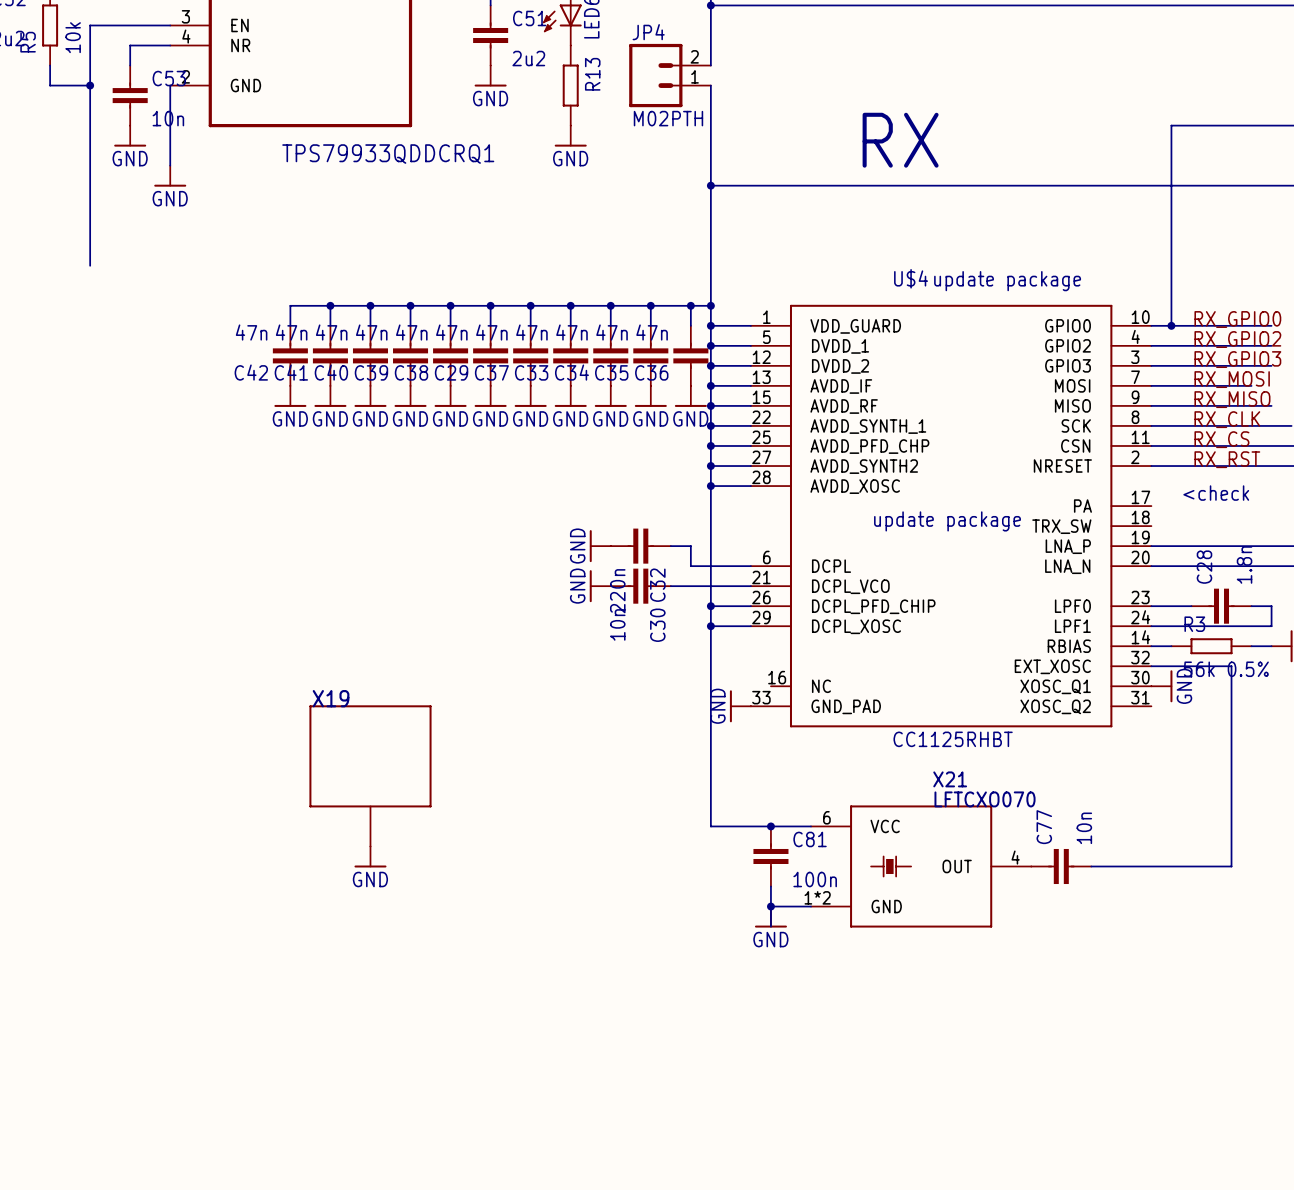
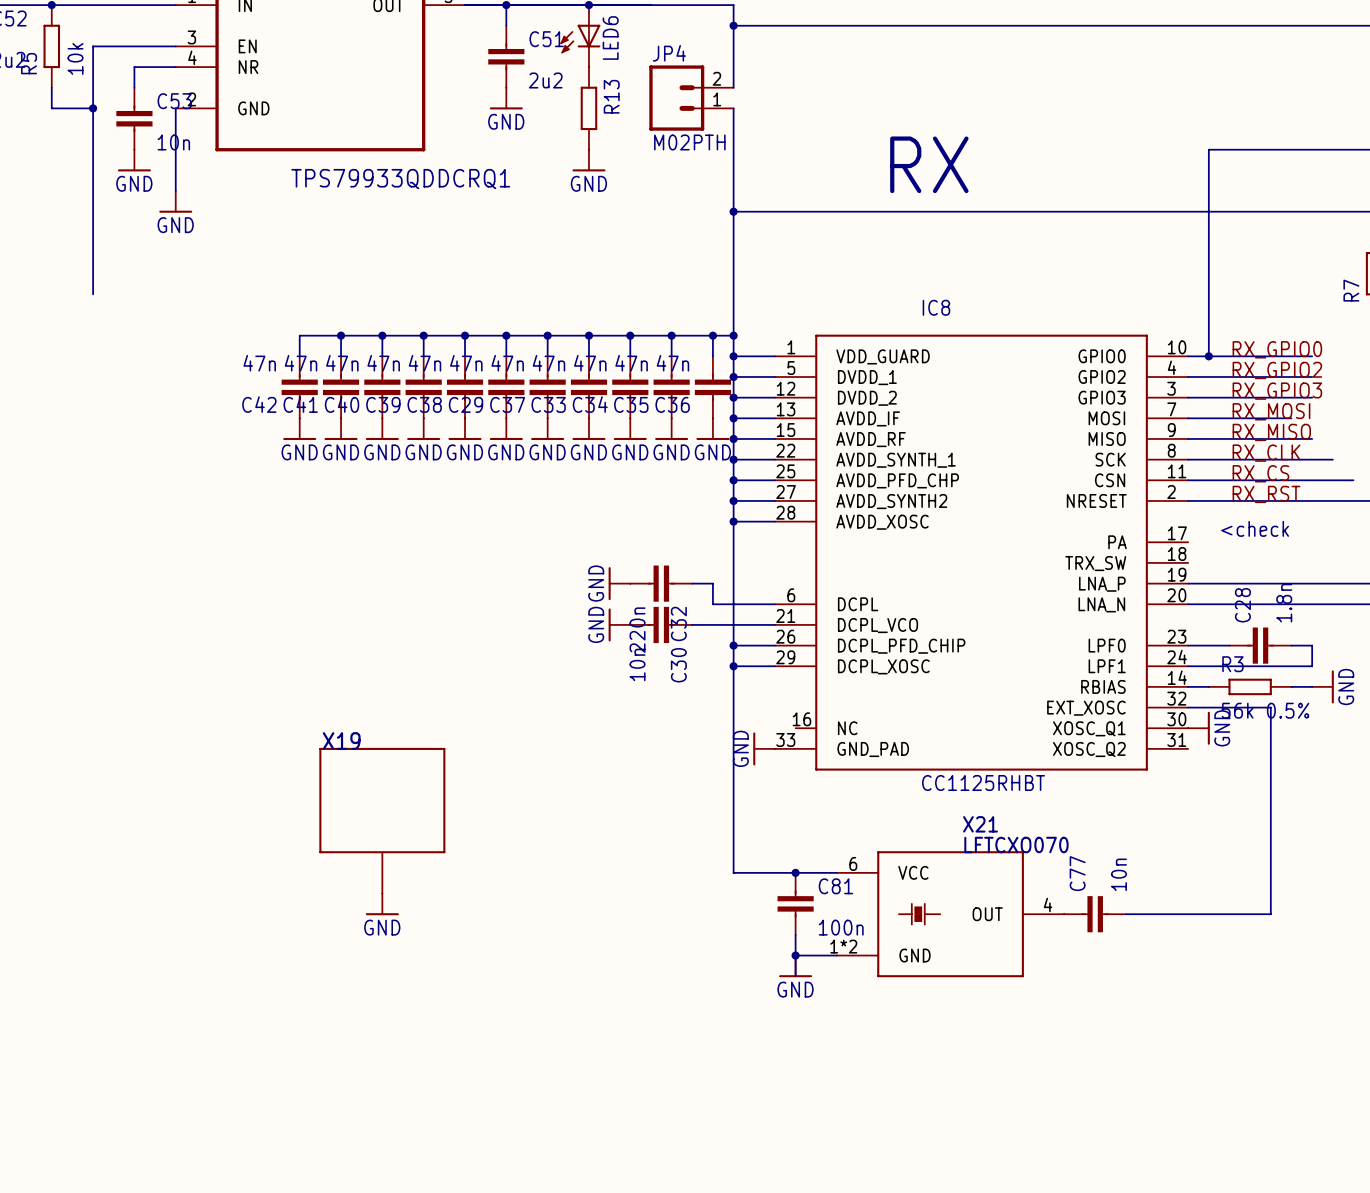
U$4 name: U$4 (911, 278) -> IC8 (936, 307)
text: update package (1007, 281) -> none
text: update package (947, 521) -> none

